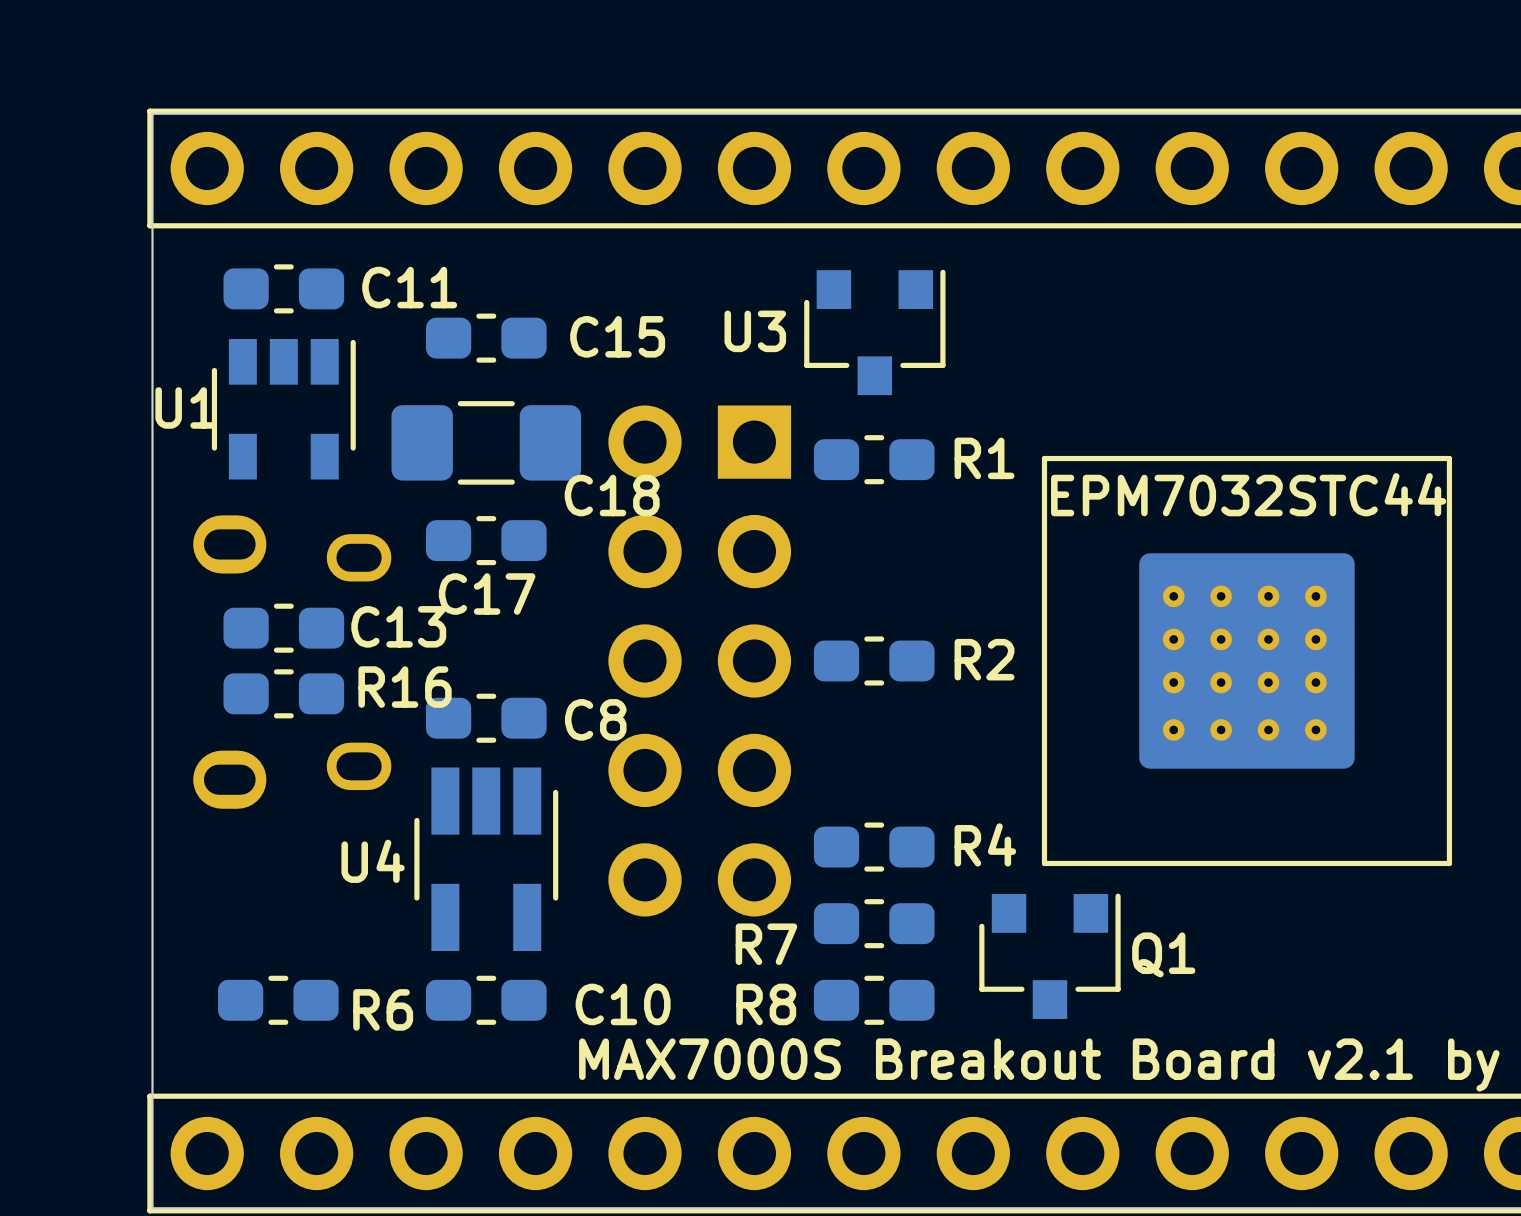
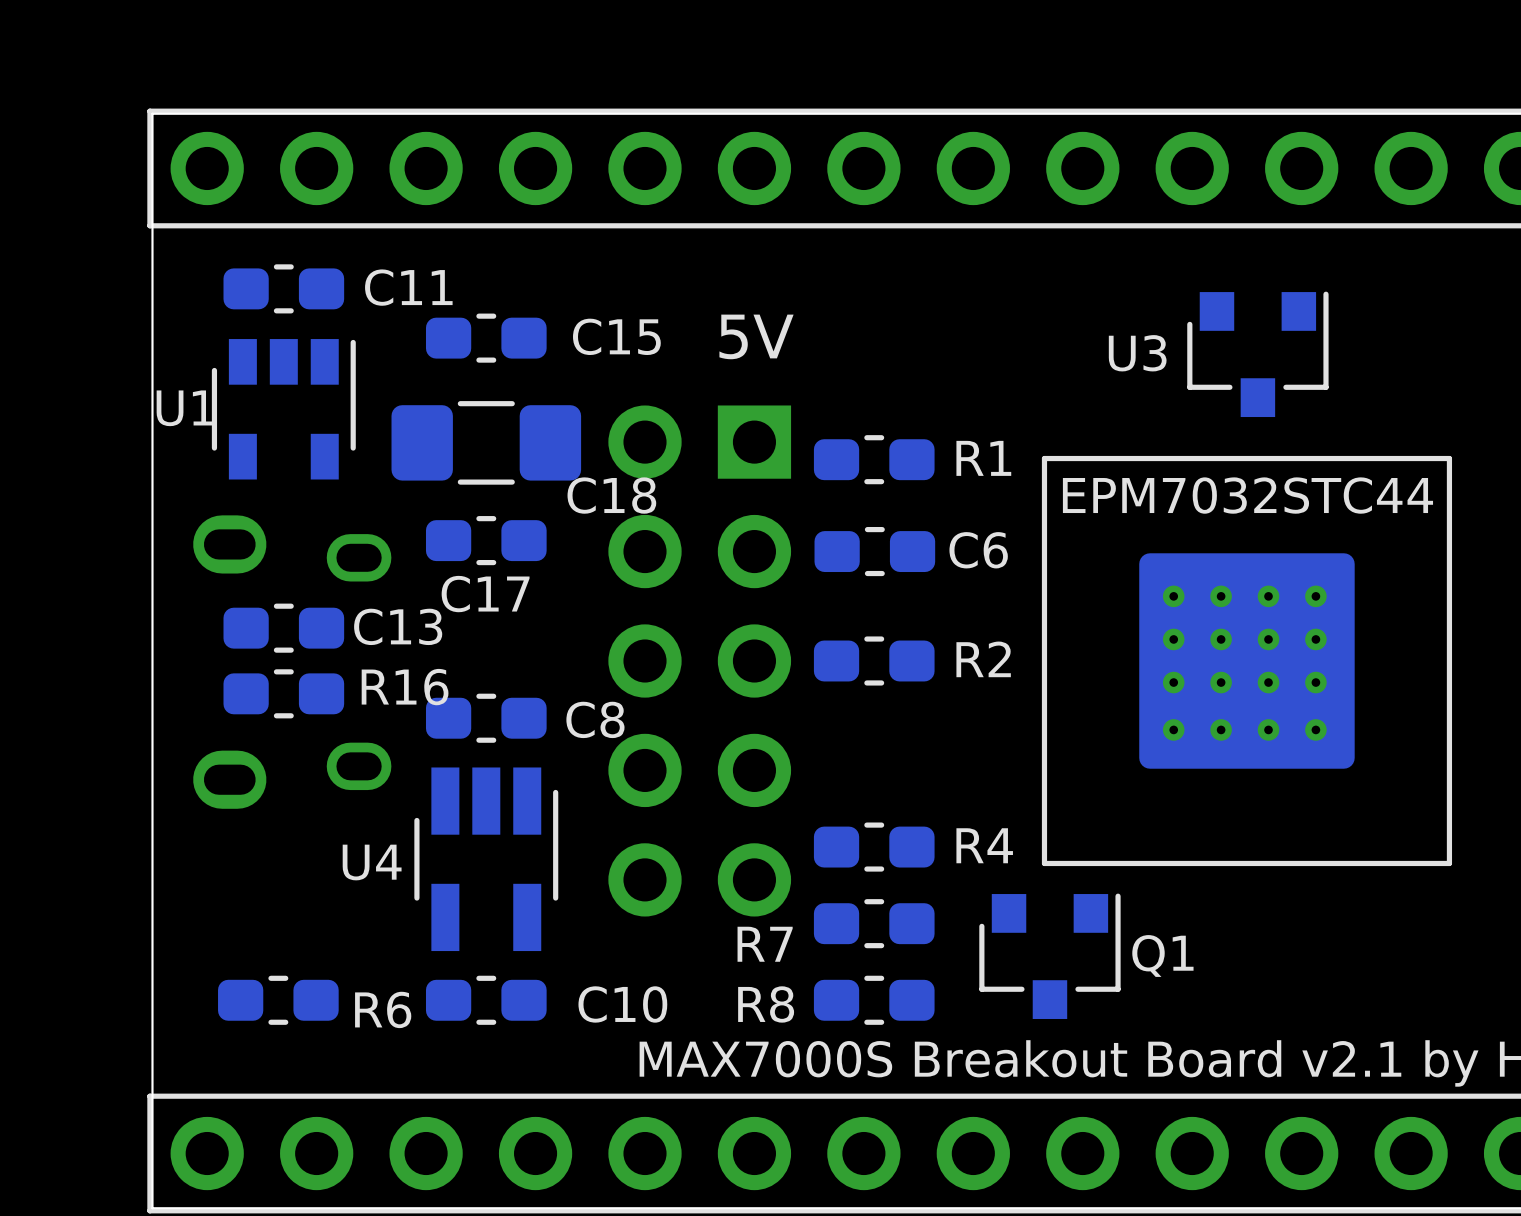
U3 position: (874, 332) -> (1257, 354)
text: none -> 5V (756, 336)
C6: none -> (874, 551)

